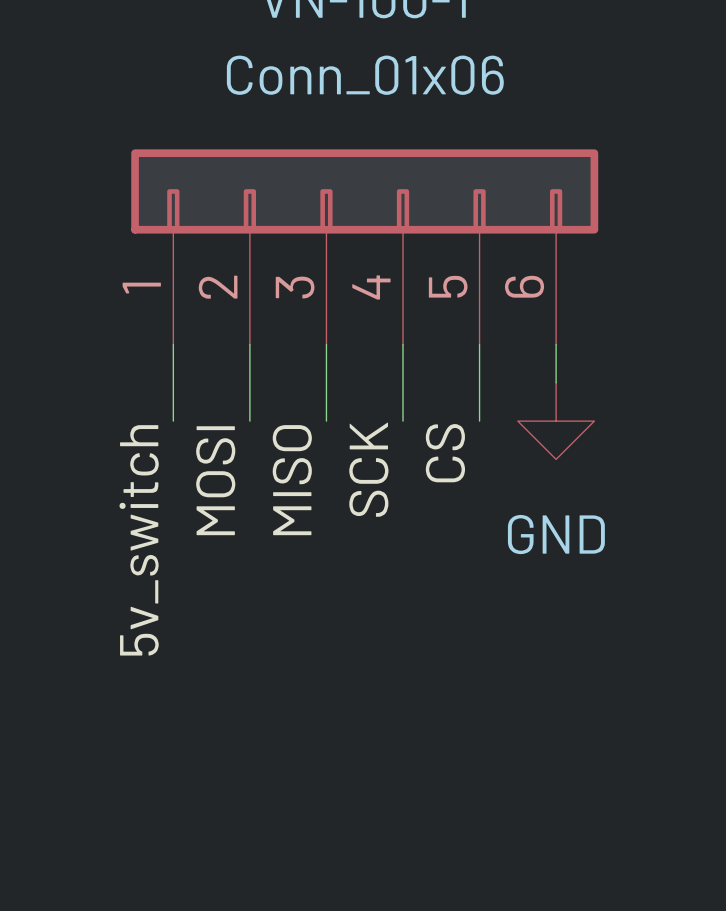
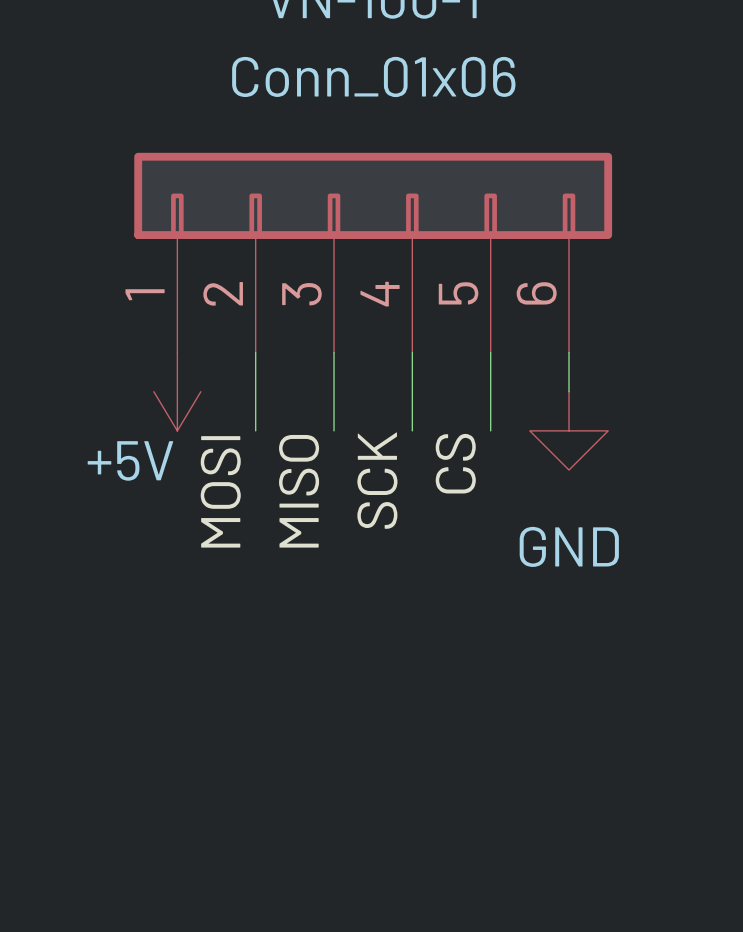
power symbol: none -> +5V (177, 391)
label: 5v_switch (139, 540) -> none

